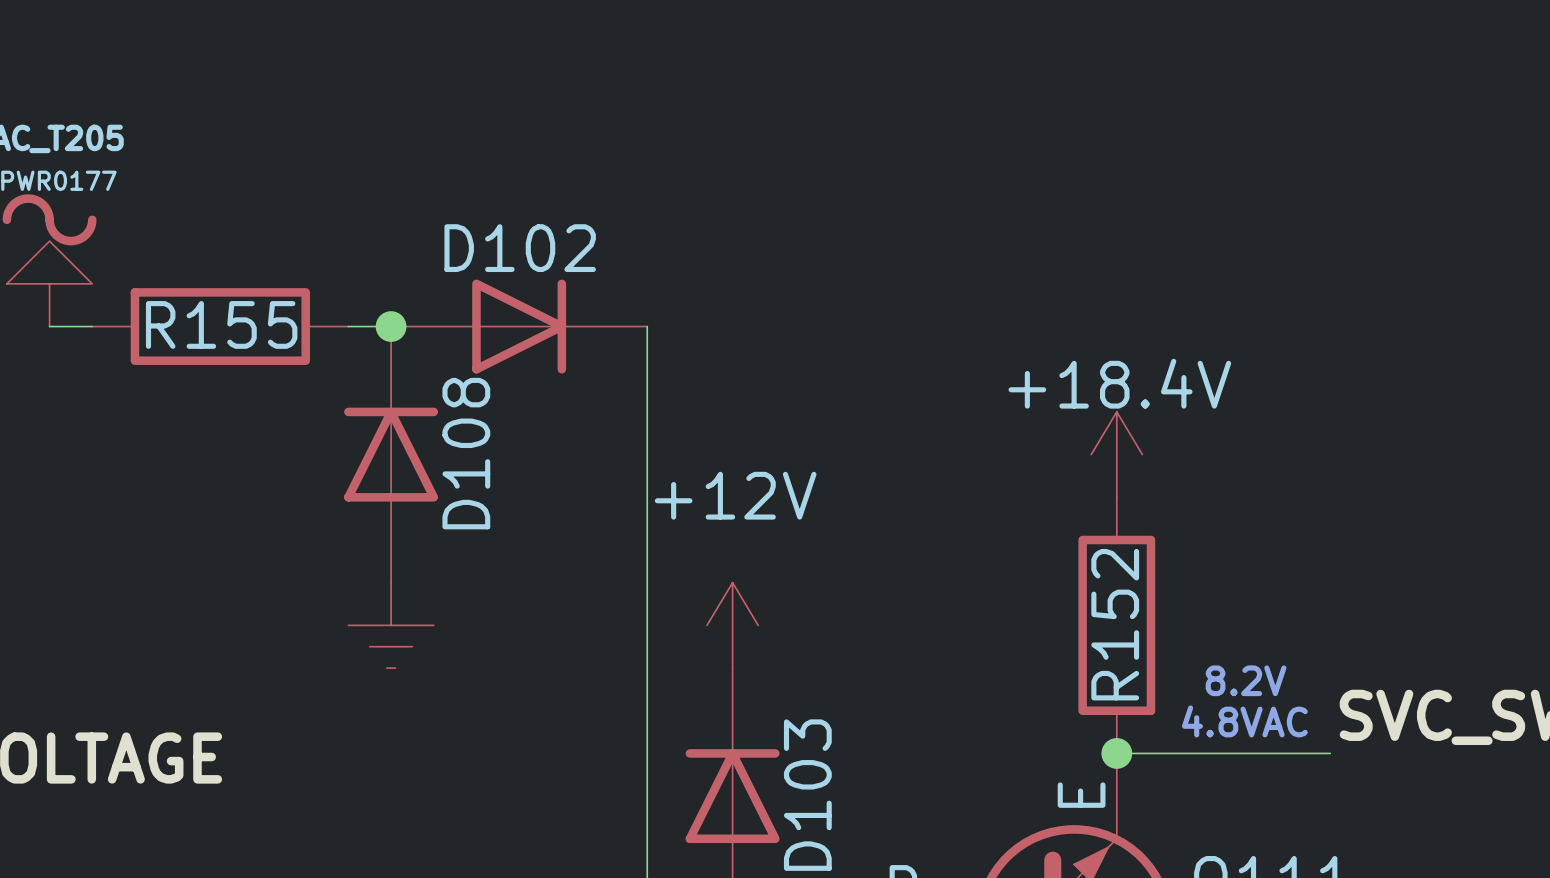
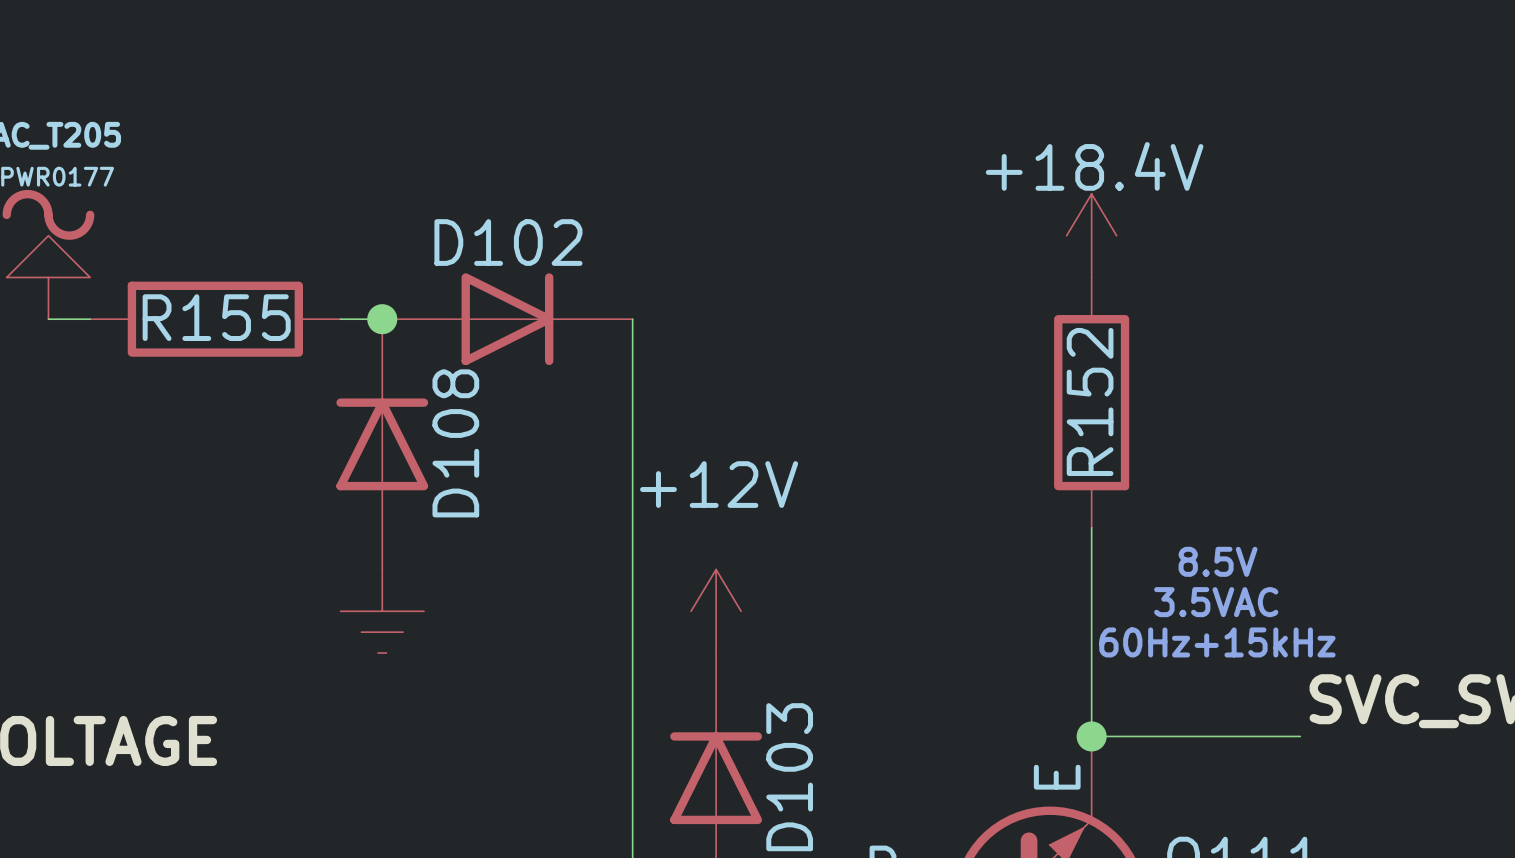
power symbol position: +18.4V (1116, 454) -> +18.4V (1091, 235)
wire: none -> (1091, 527) (1091, 736)
text: none -> 8.5V (1218, 561)
text: none -> 3.5VAC (1216, 602)
R152 position: (1116, 625) -> (1091, 402)
text: 8.2V (1246, 680) -> 60Hz+15kHz (1217, 642)
text: 4.8VAC (1244, 721) -> none

